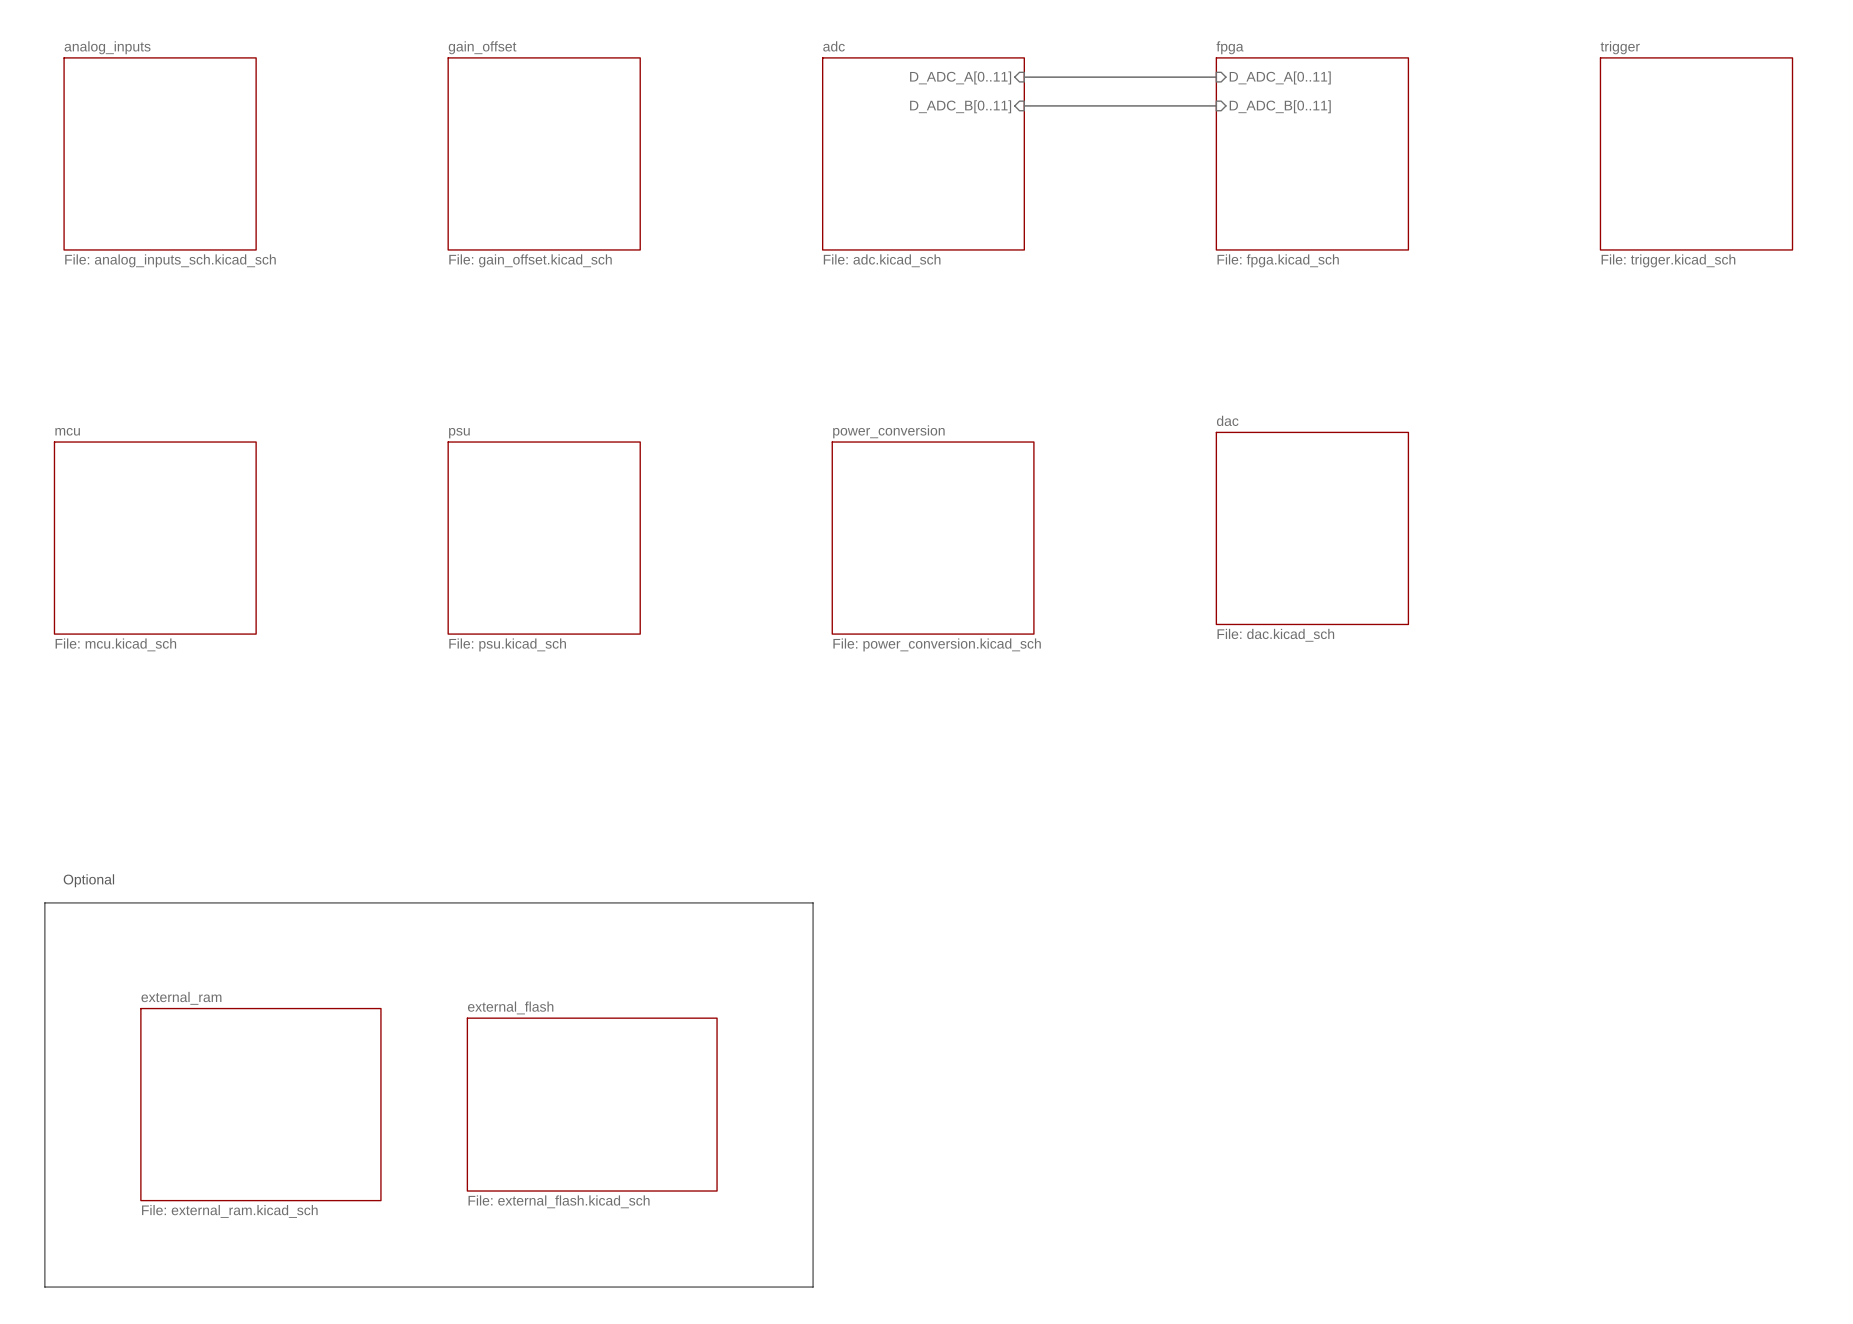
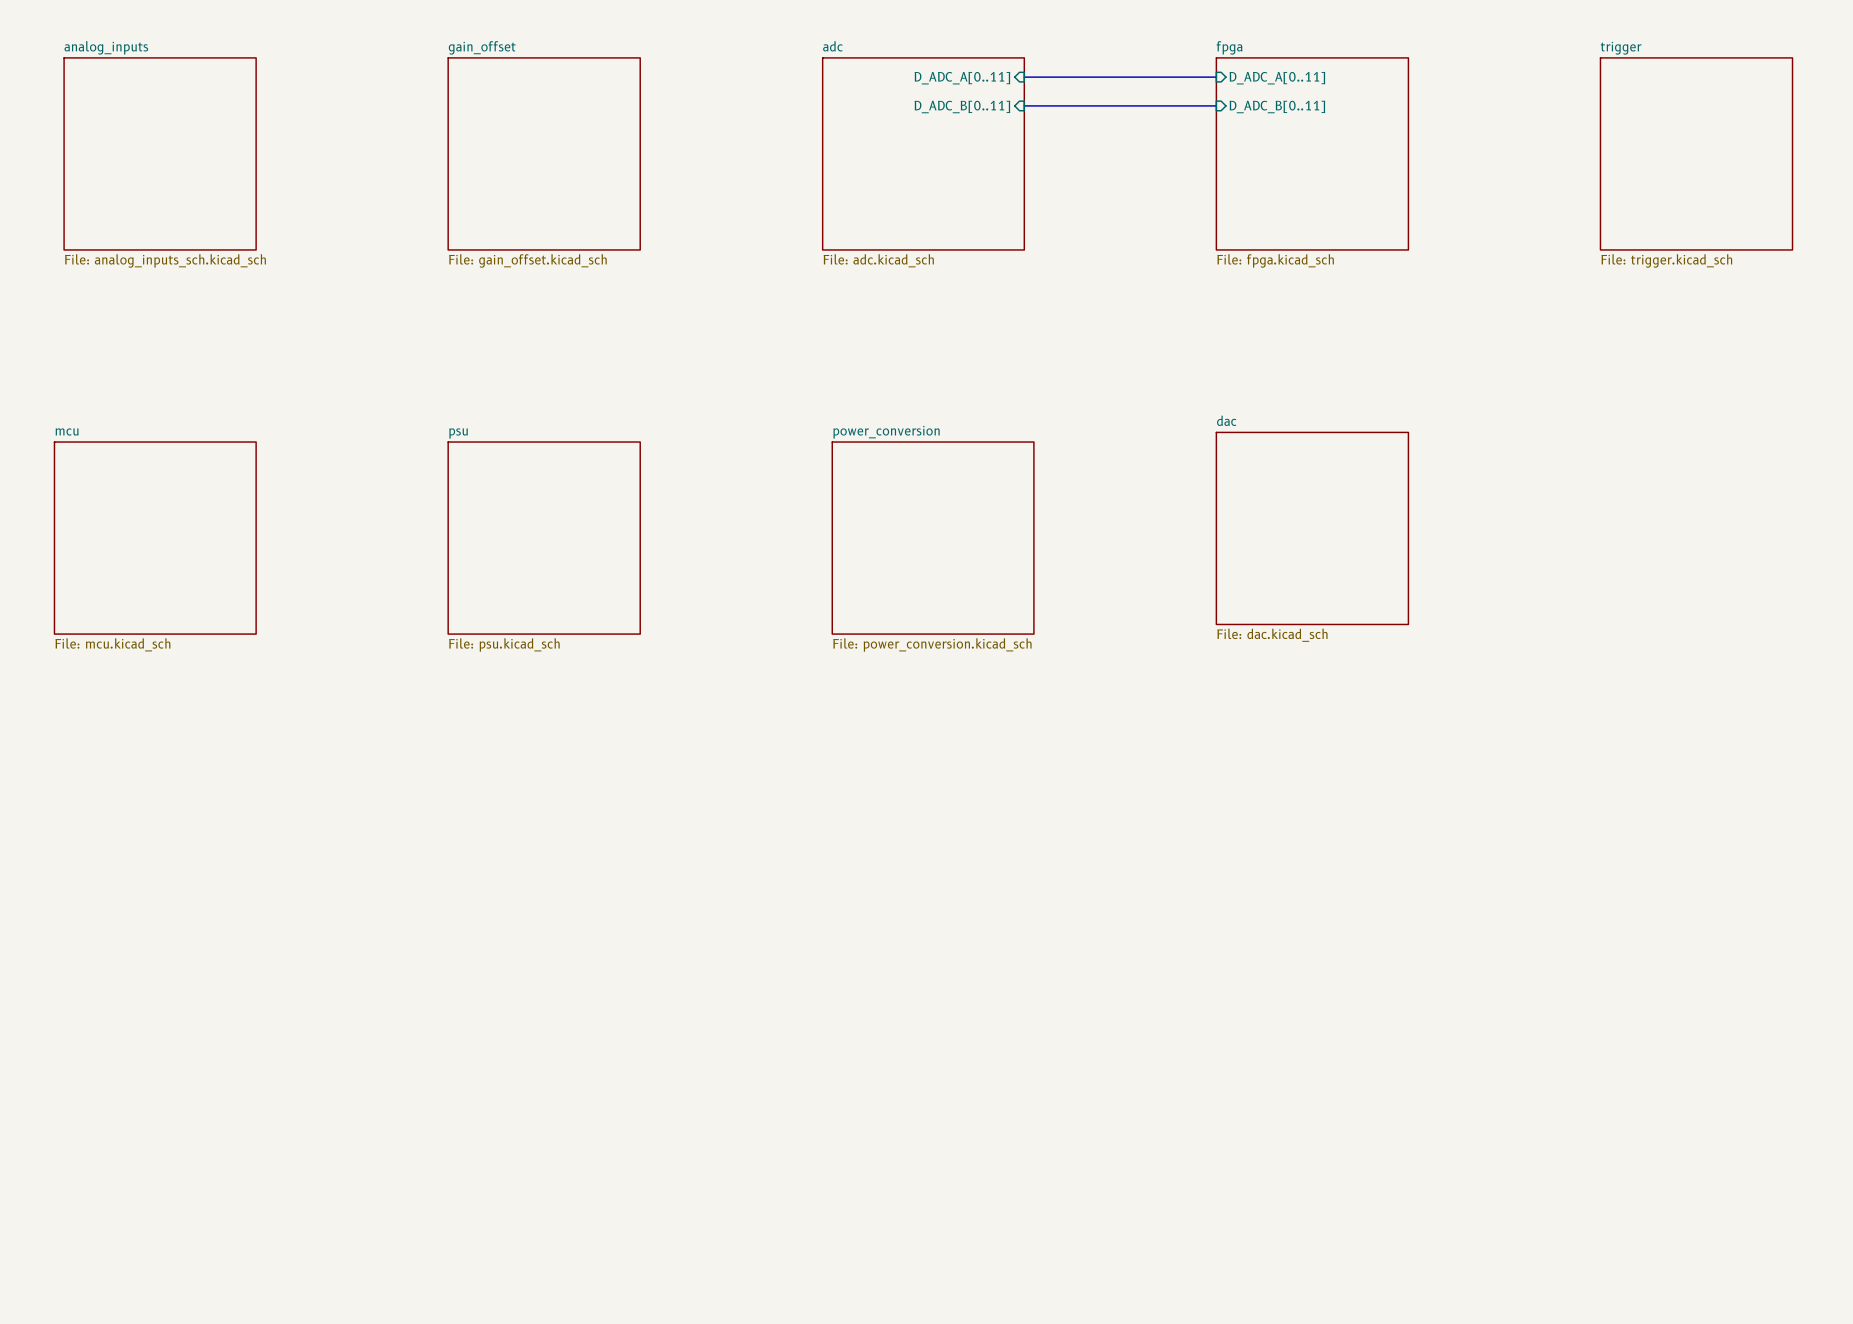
text: Optional (88, 880) -> none
line: (44, 902) (813, 902) (813, 1287) (44, 1287) (44, 902) -> none
sheet external_ram: File: external_ram.kicad_sch (260, 1104) -> none
sheet external_flash: File: external_flash.kicad_sch (592, 1104) -> none

